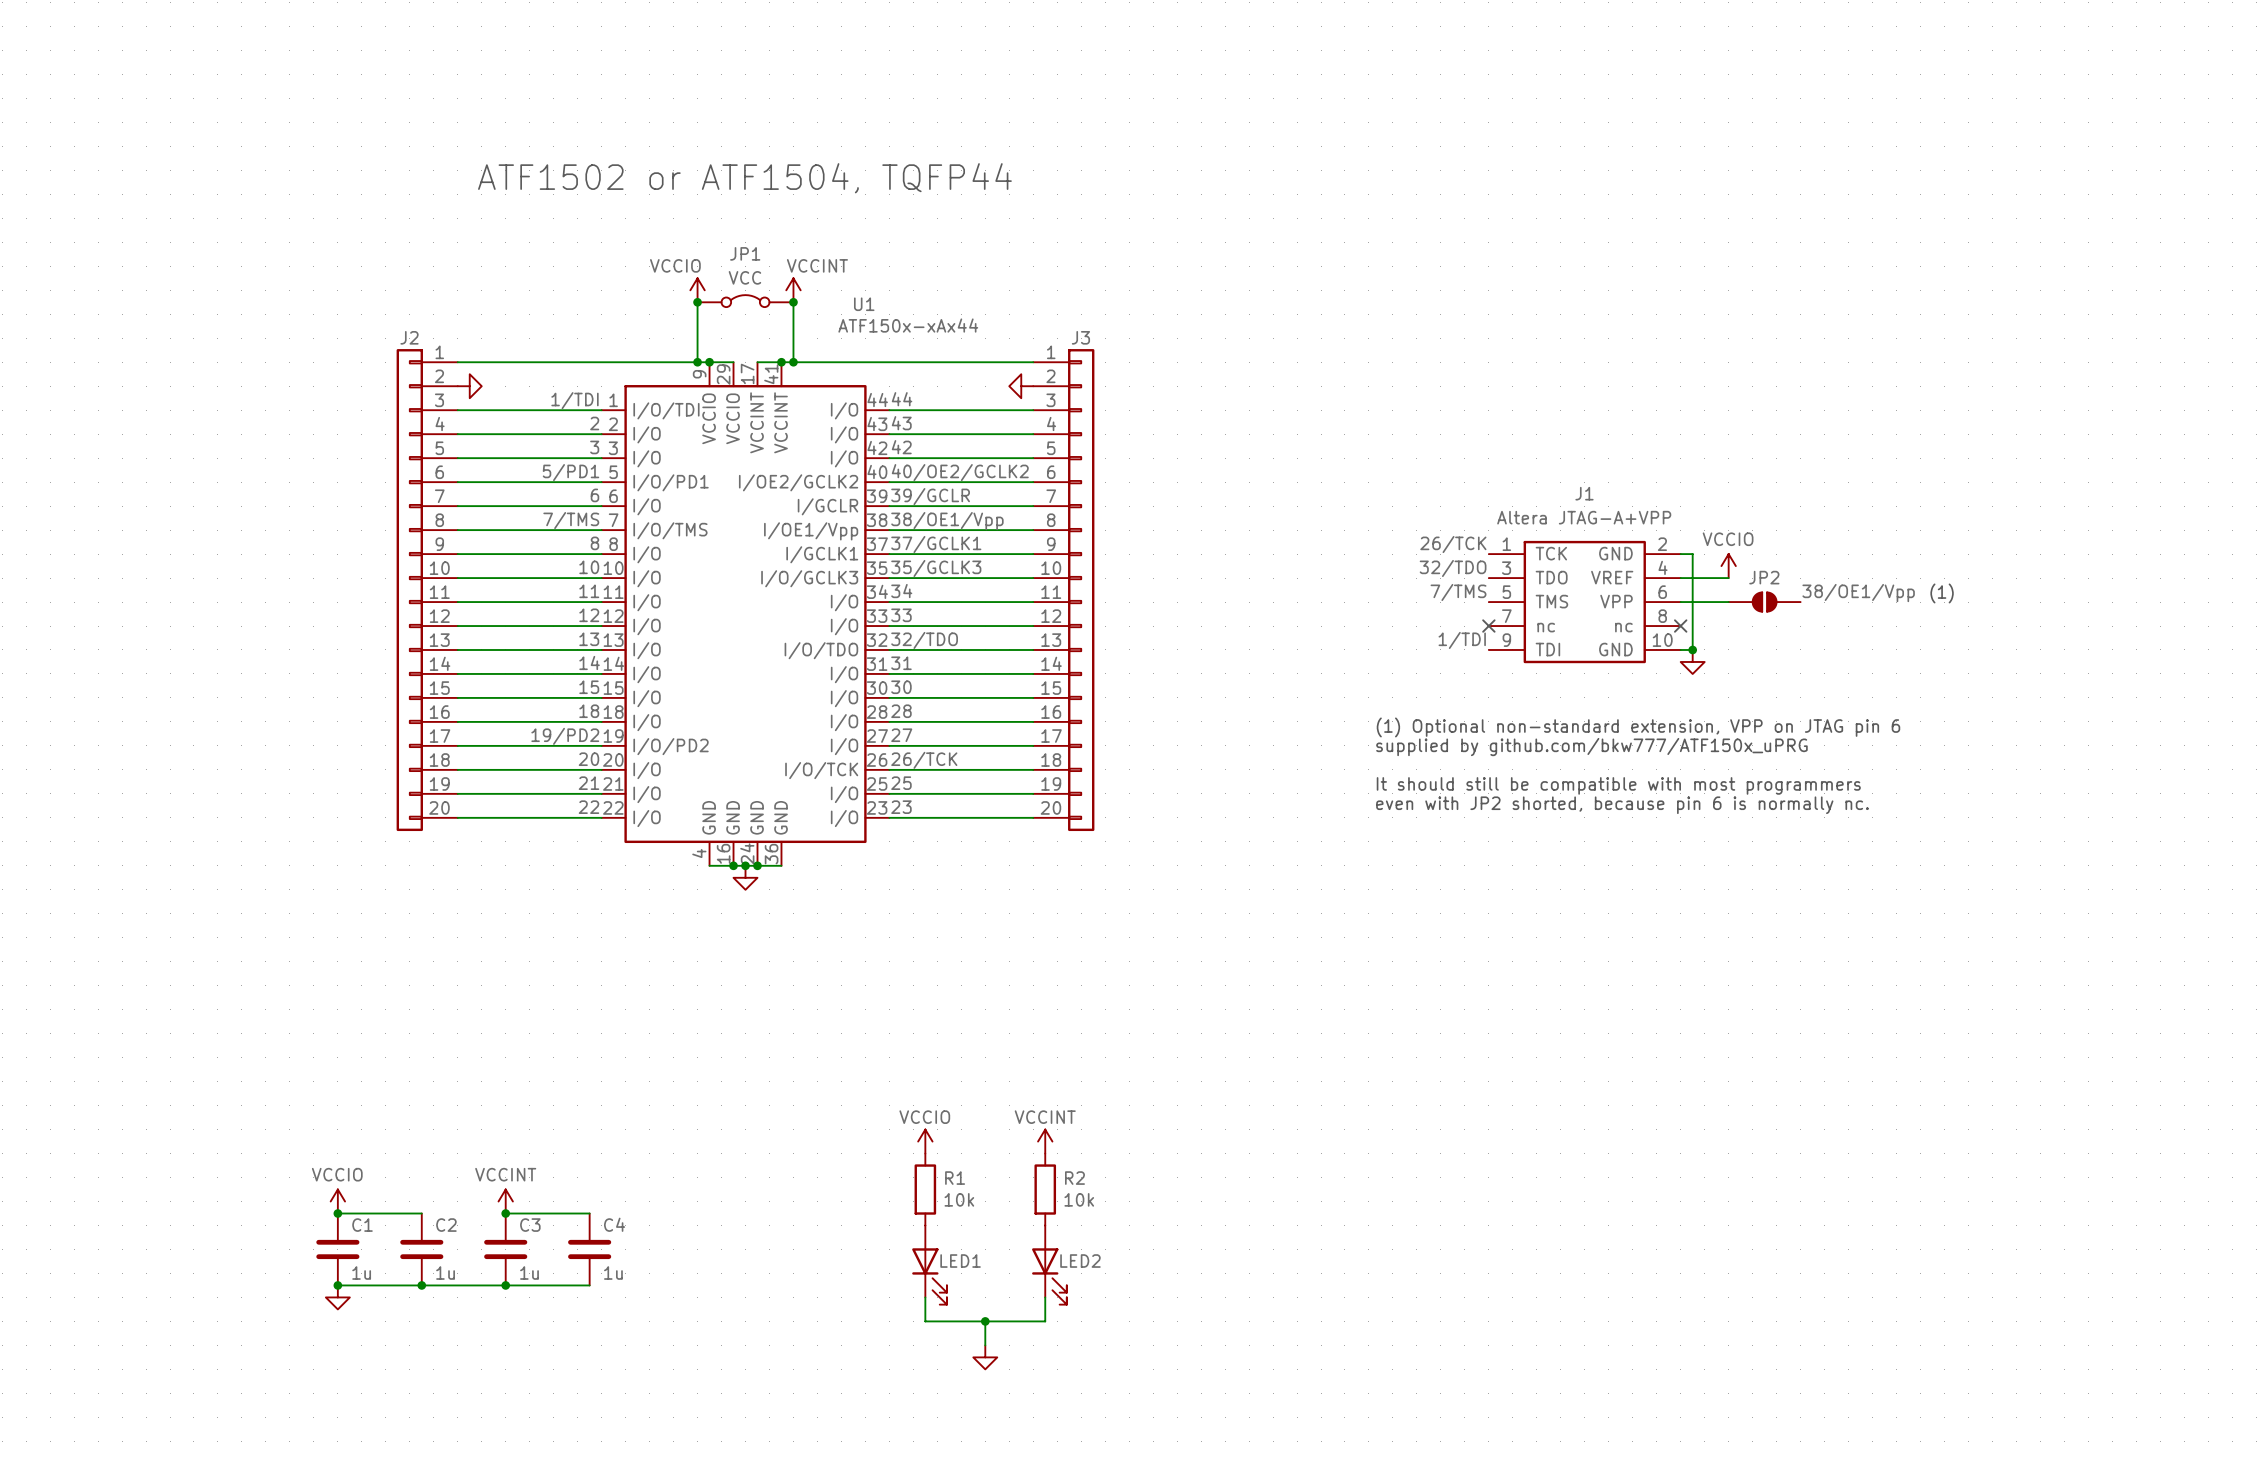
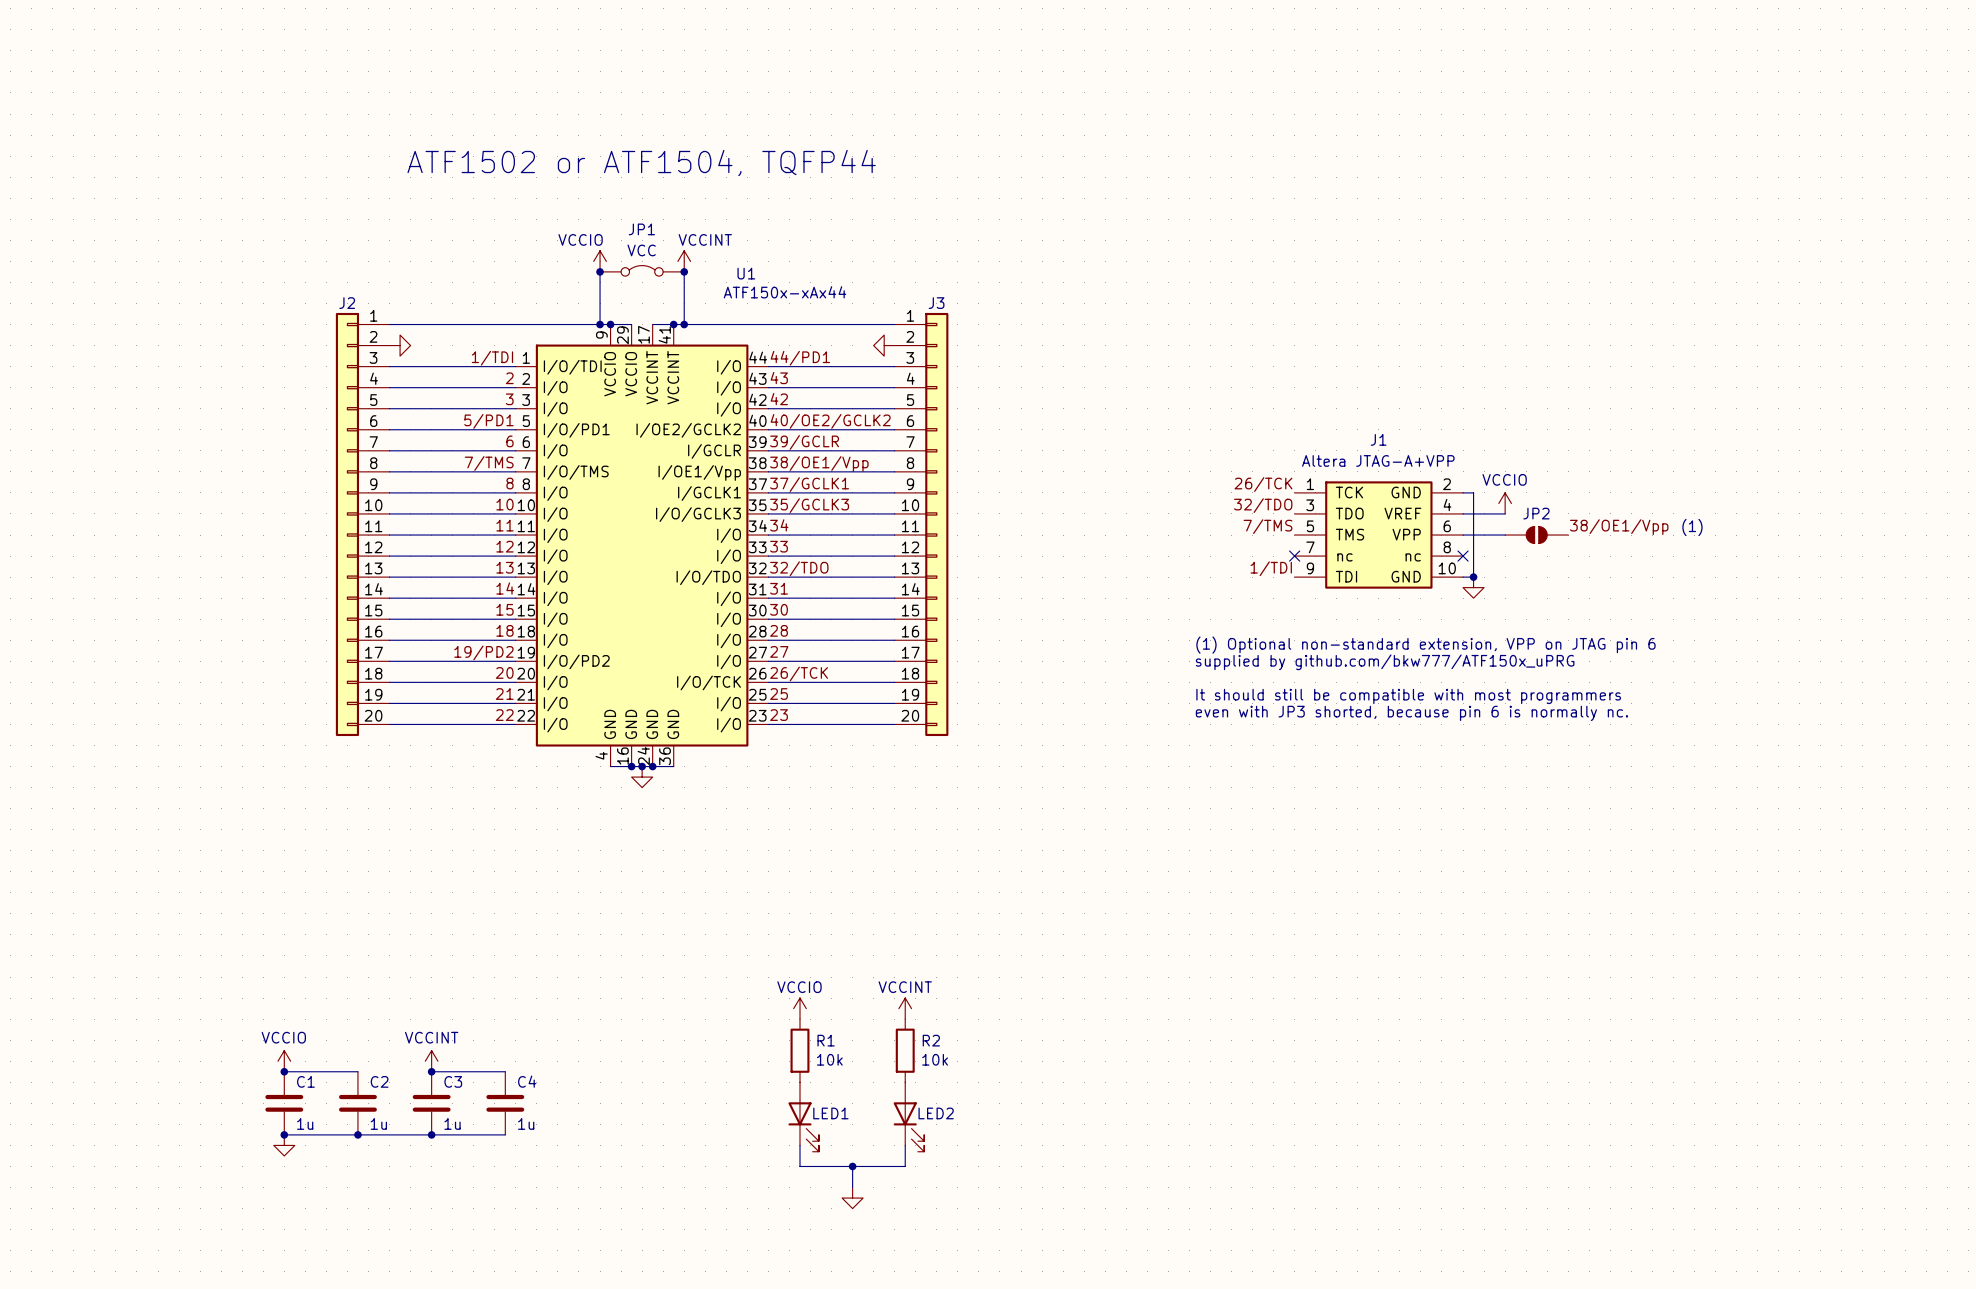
label: 44 (902, 399) -> 44/PD1 (800, 358)
text: even with JP2 shorted, because pin 6 is normally nc. (1622, 805) -> even with JP3 shorted, because pin 6 is normally nc. (1411, 713)

